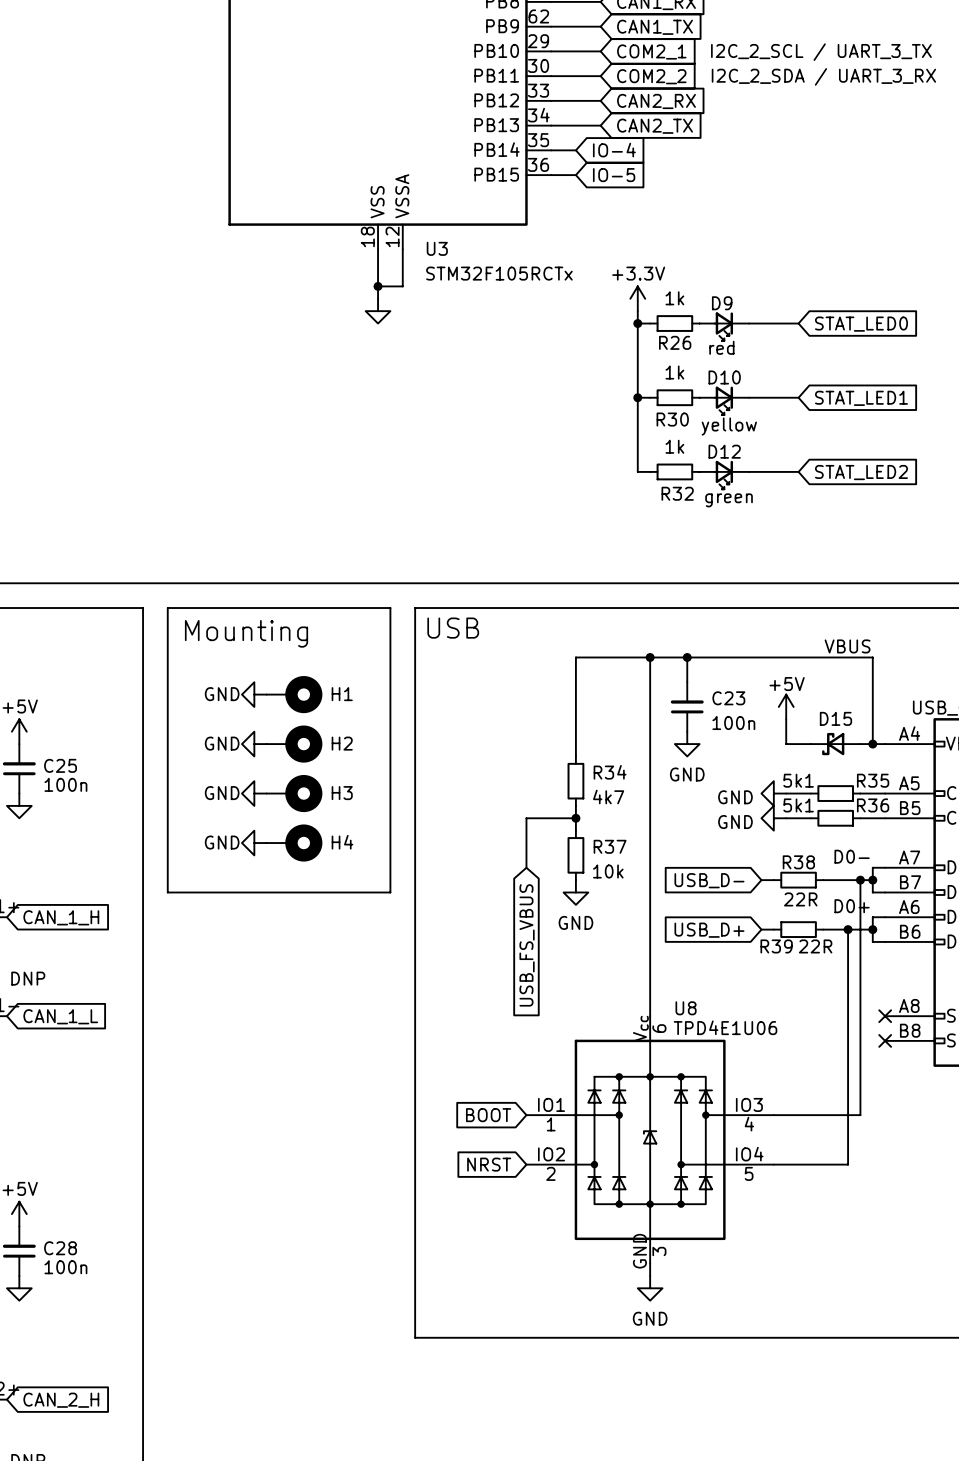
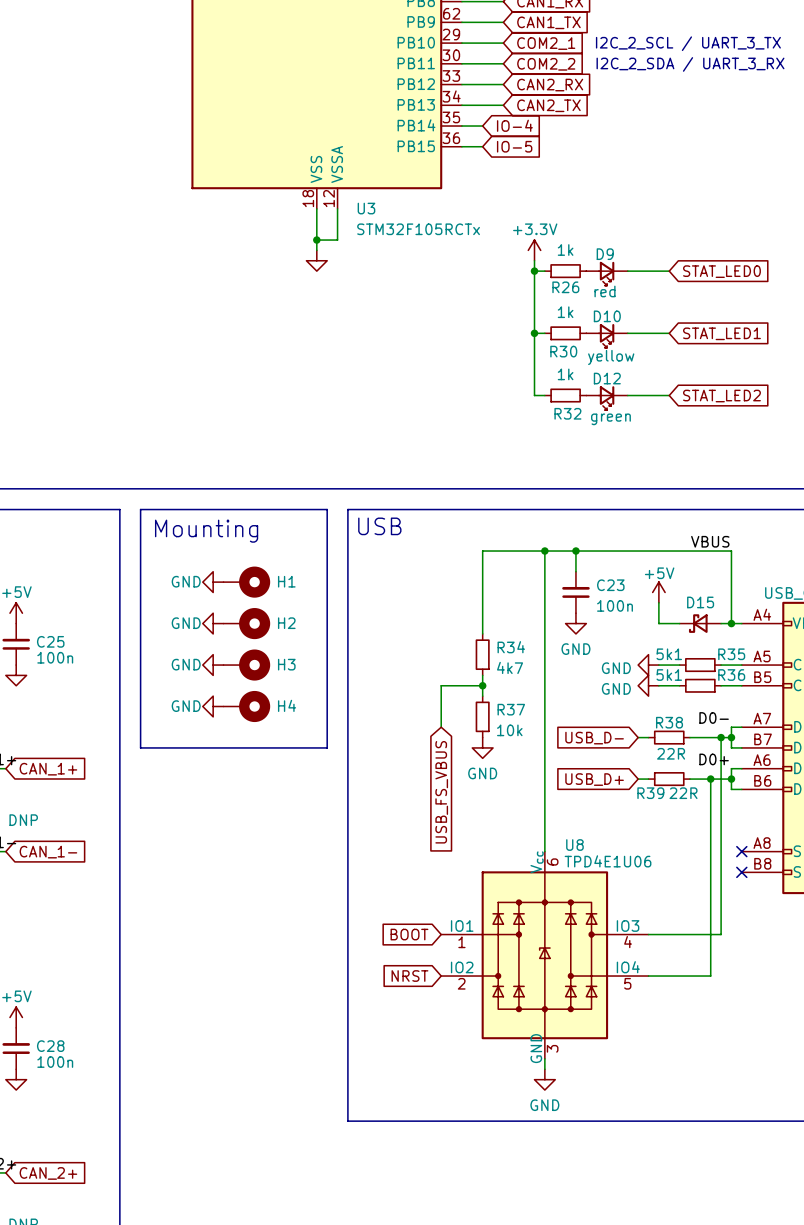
global label: CAN_1_H (61, 917) -> CAN_1+ (48, 769)
global label: CAN_1_L (60, 1016) -> CAN_1- (48, 852)
global label: CAN_2_H (61, 1400) -> CAN_2+ (48, 1173)

